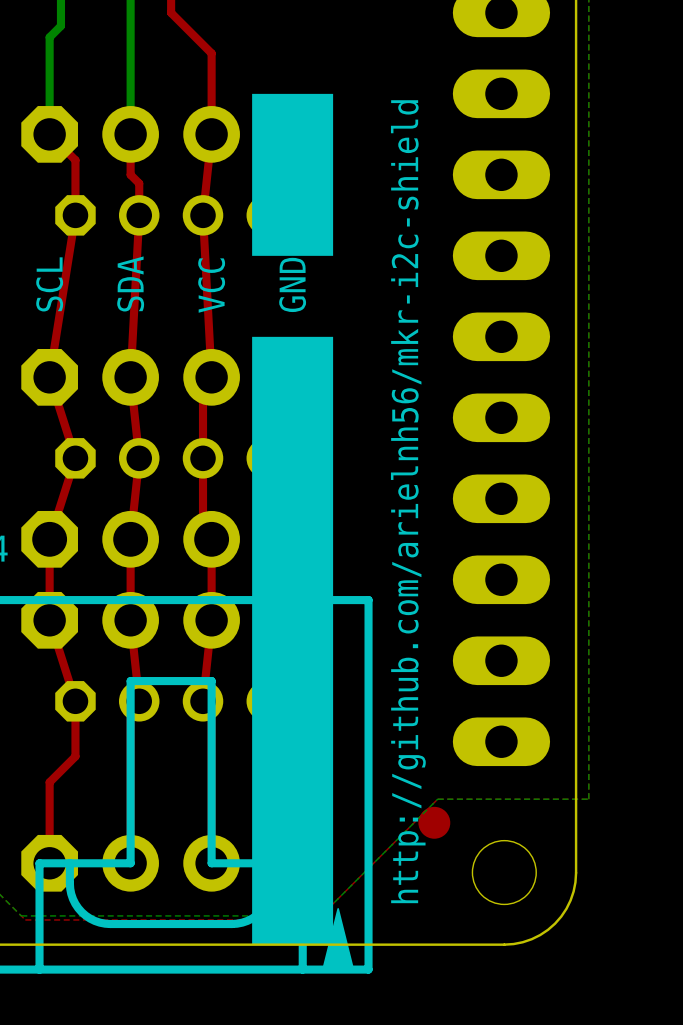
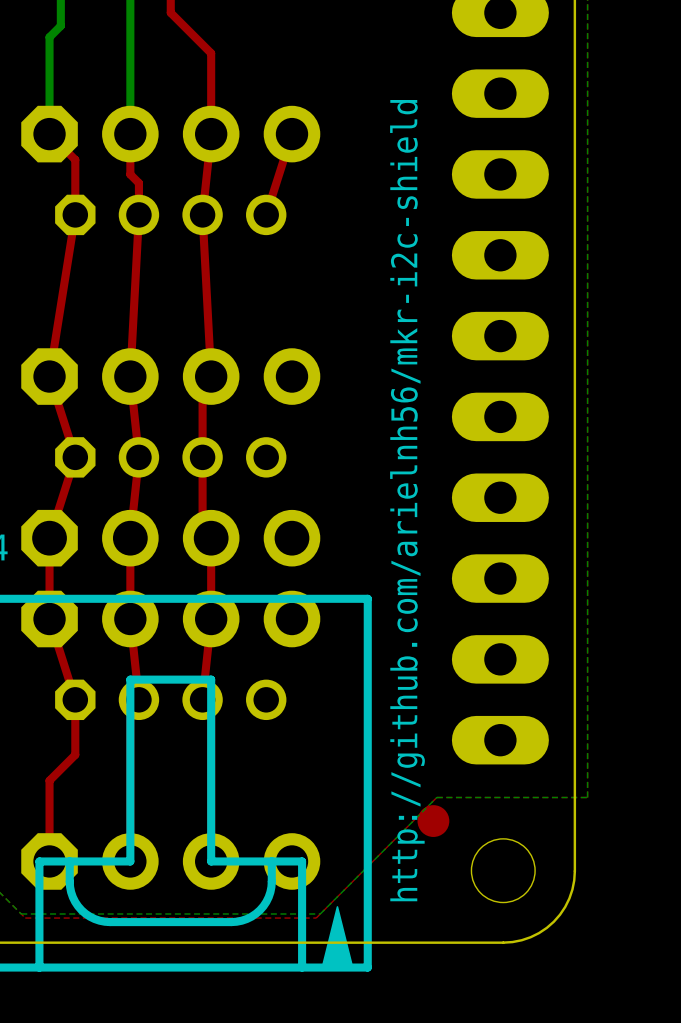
drawing: [252, 93, 334, 256] -> none
text: SDA (130, 283) -> none
text: SCL (49, 284) -> none
text: GND (292, 284) -> none
text: VCC (211, 285) -> none
drawing: [252, 336, 334, 945] -> none

